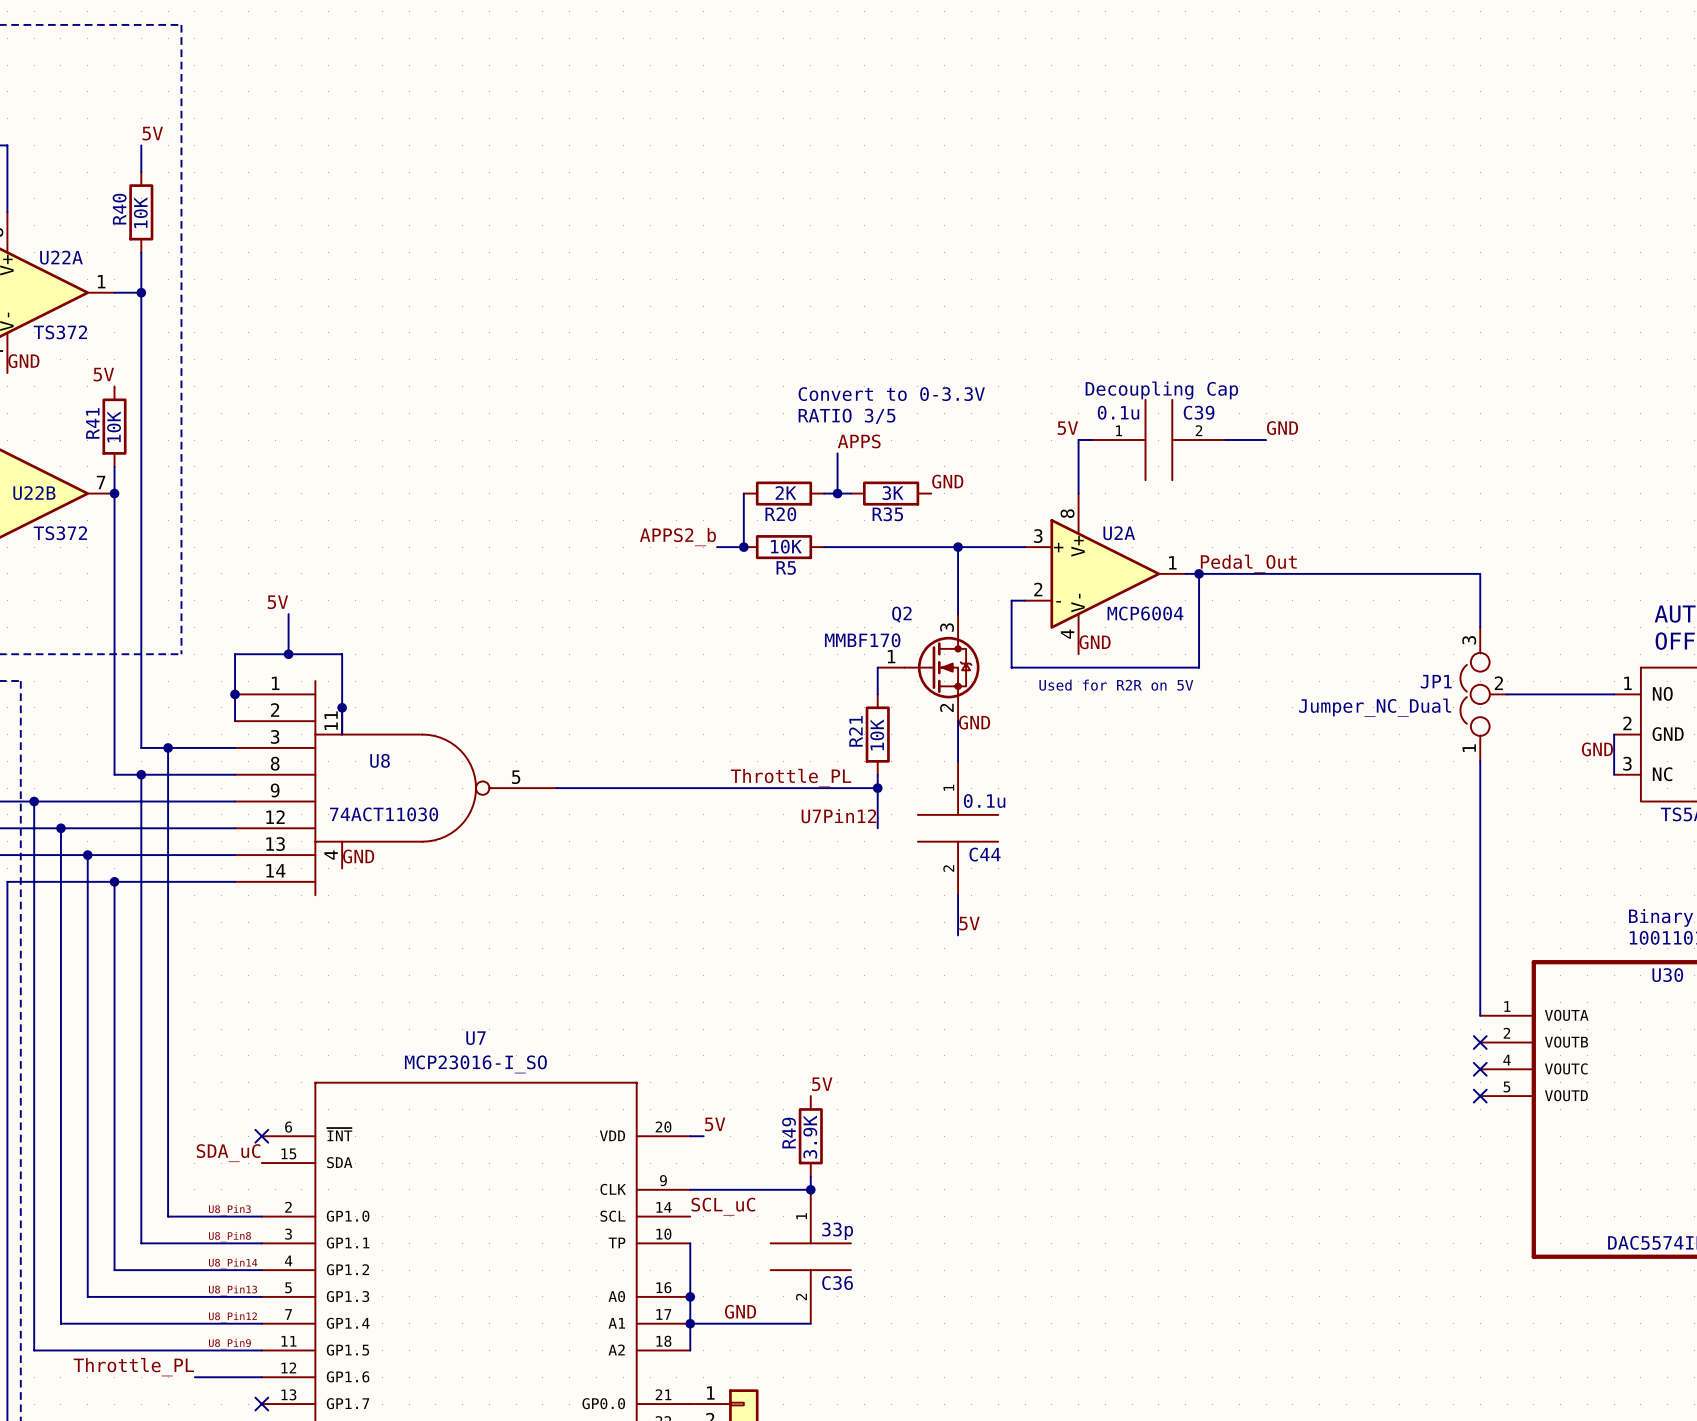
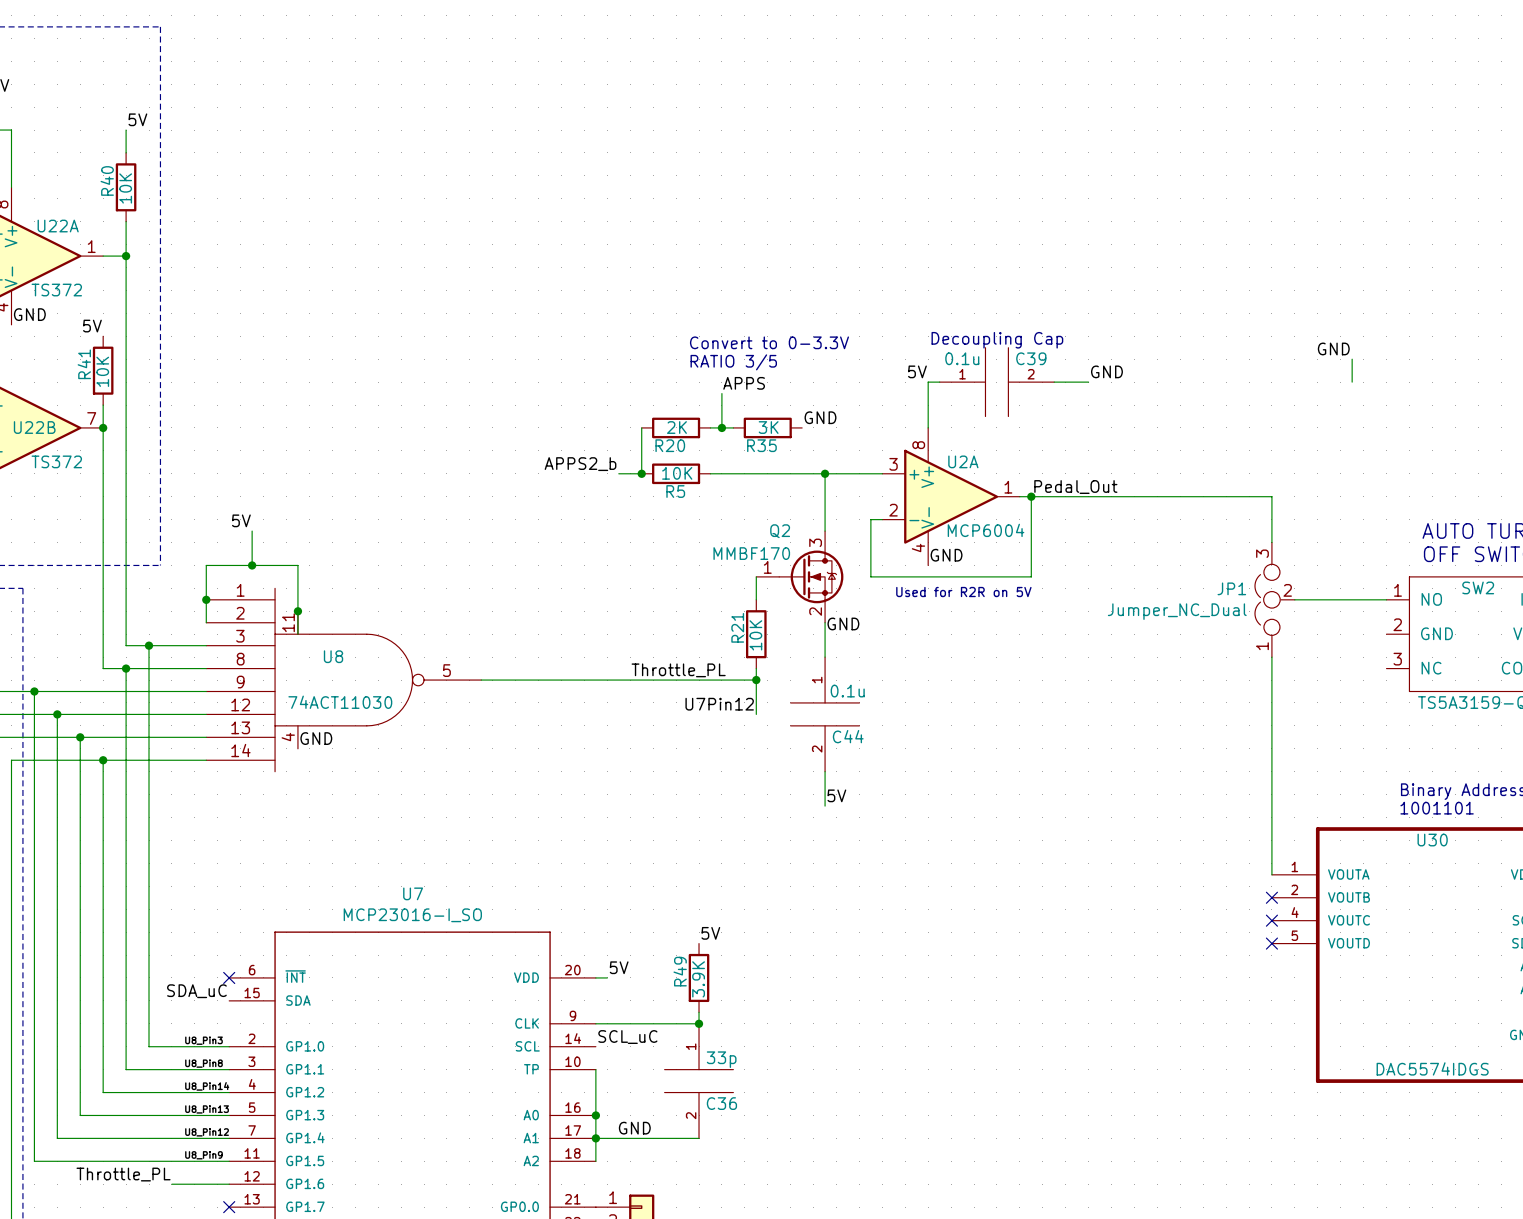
label: none -> GND (1333, 348)
wire: none -> (1352, 359) (1352, 382)
wire: (1614, 734) (1614, 774) -> none
label: GND (1597, 749) -> none

